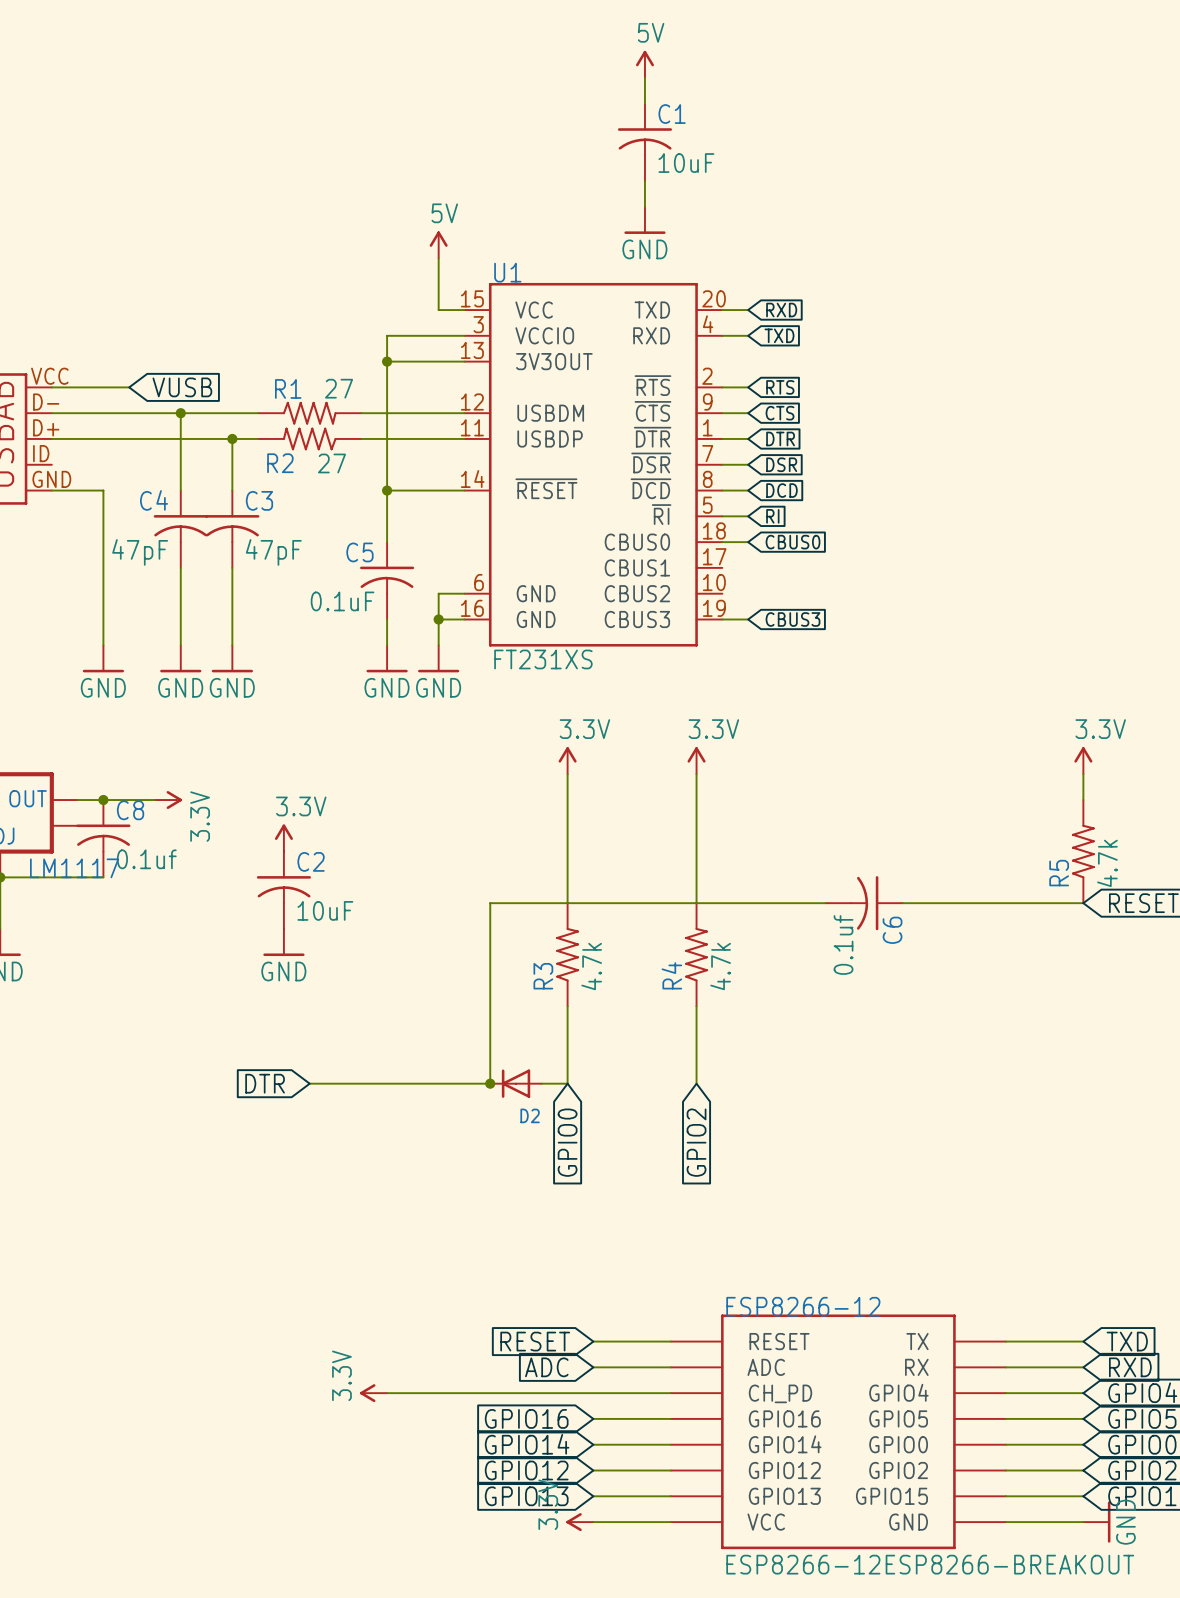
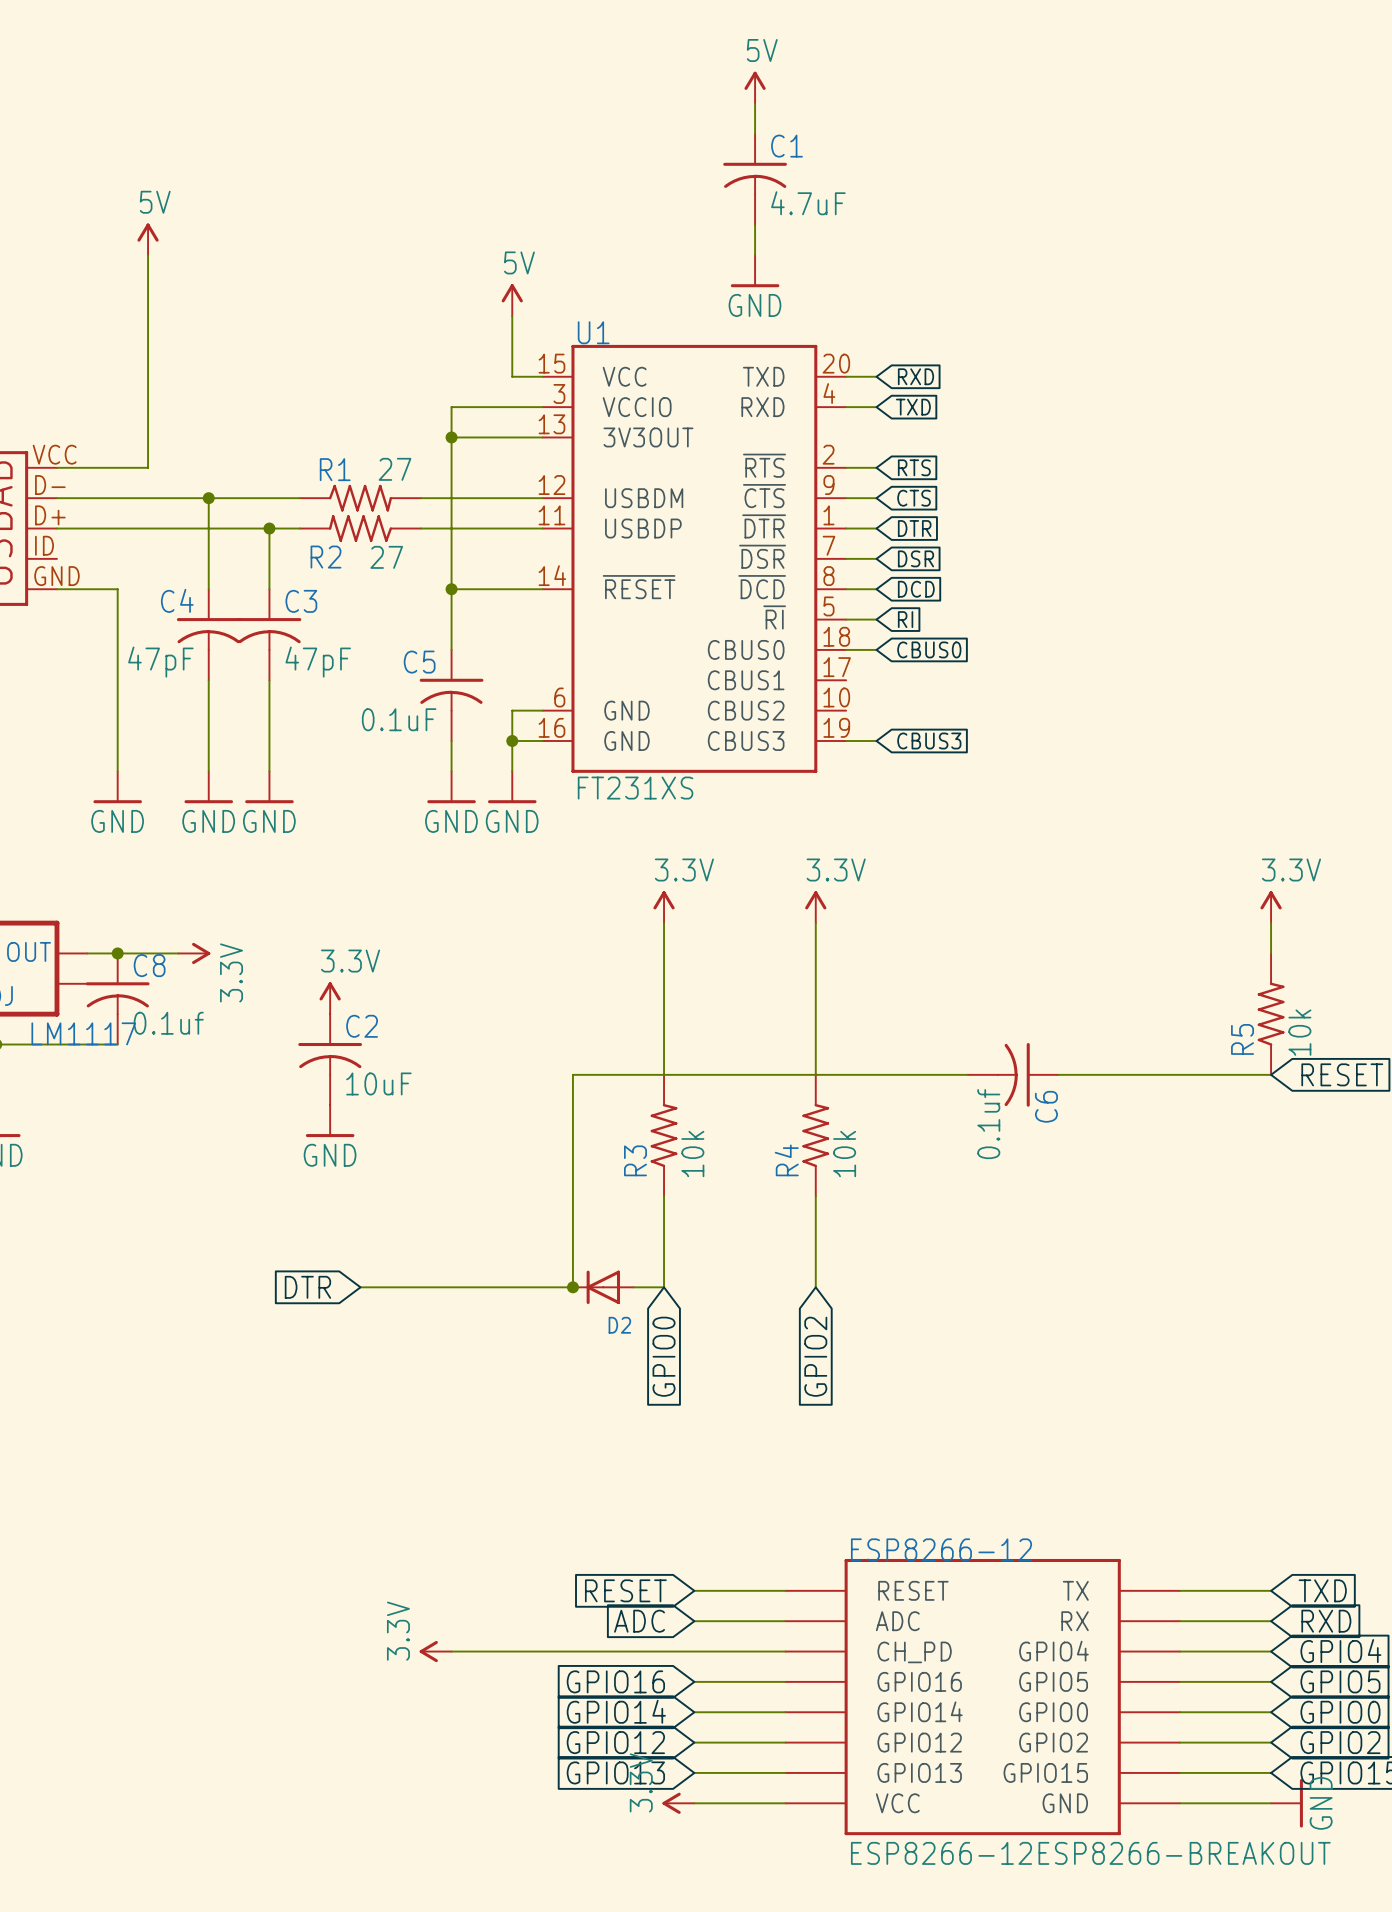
C1 value: 10uF (686, 163) -> 4.7uF (808, 203)
power symbol: none -> 5V (148, 239)
wire: none -> (148, 255) (148, 467)
global label: VUSB (182, 387) -> none
R5 value: 4.7k (1107, 863) -> 10k (1299, 1032)
R3 value: 4.7k (591, 966) -> 10k (692, 1154)
R4 value: 4.7k (720, 966) -> 10k (844, 1154)

